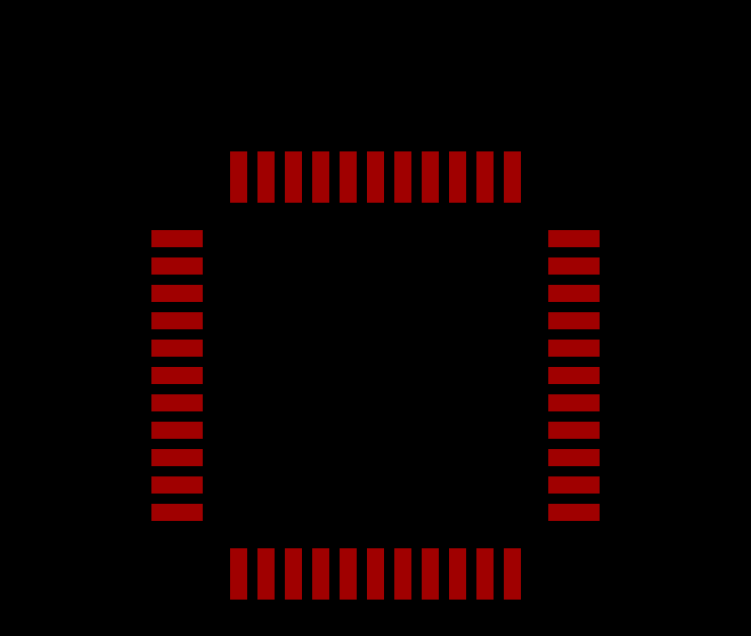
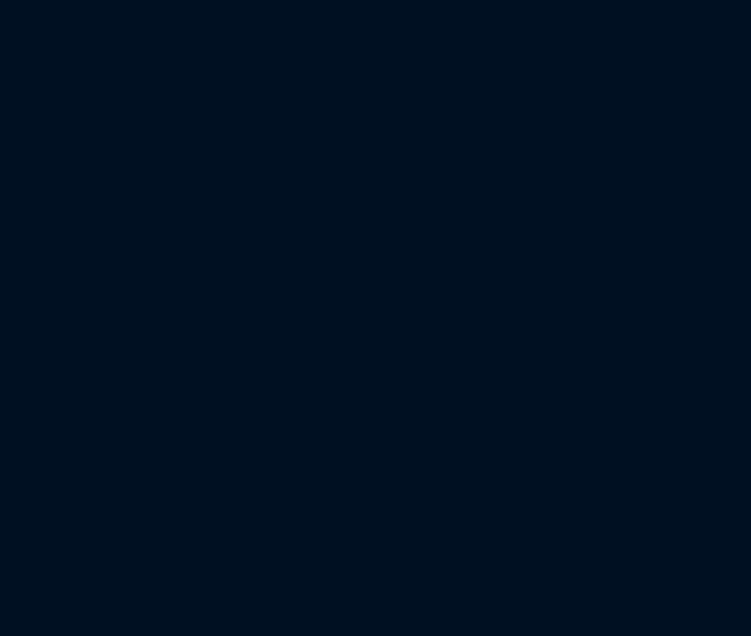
part: (375, 375) -> none

